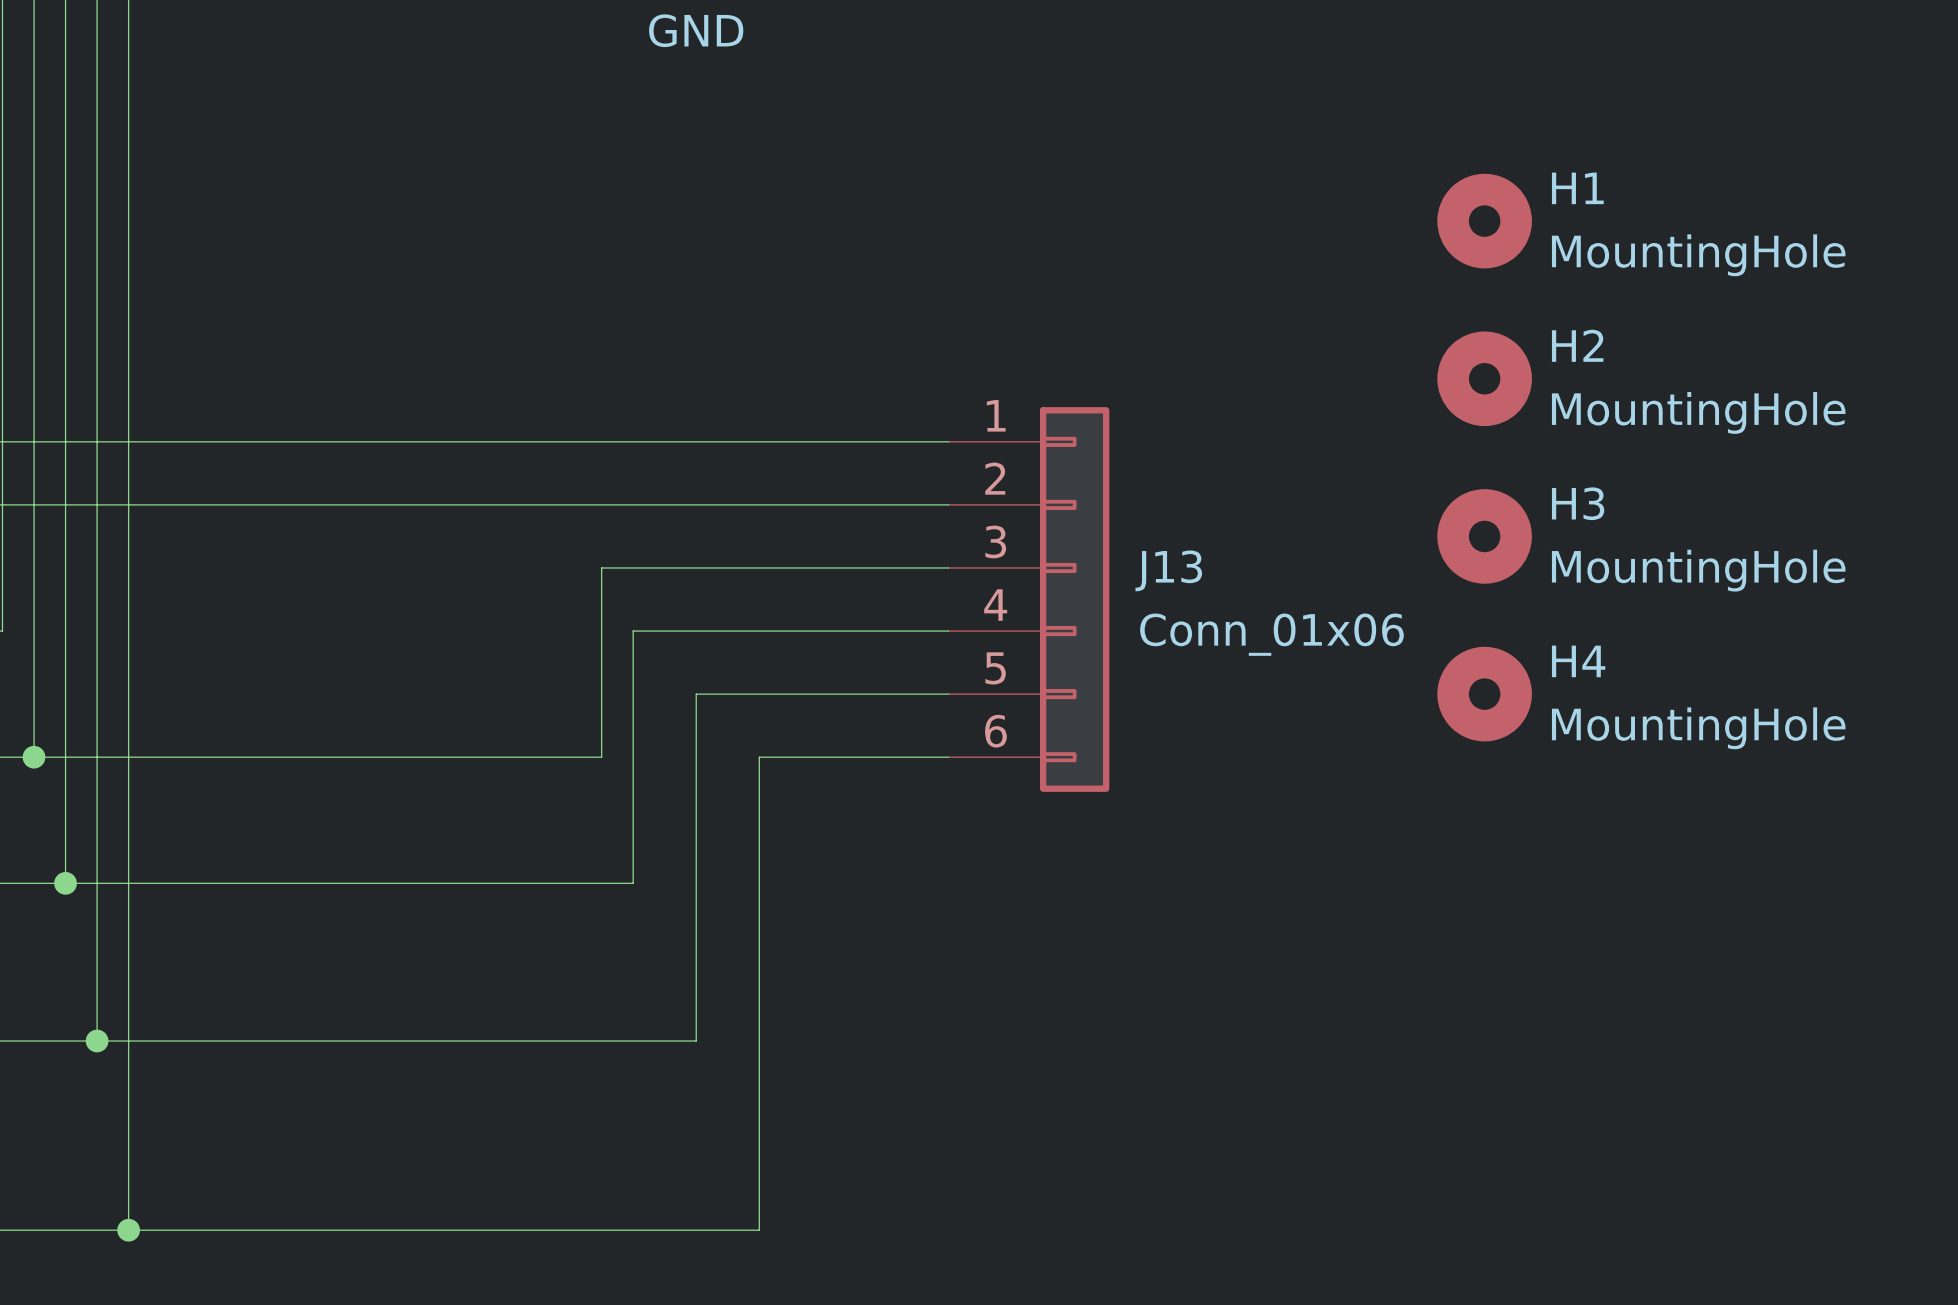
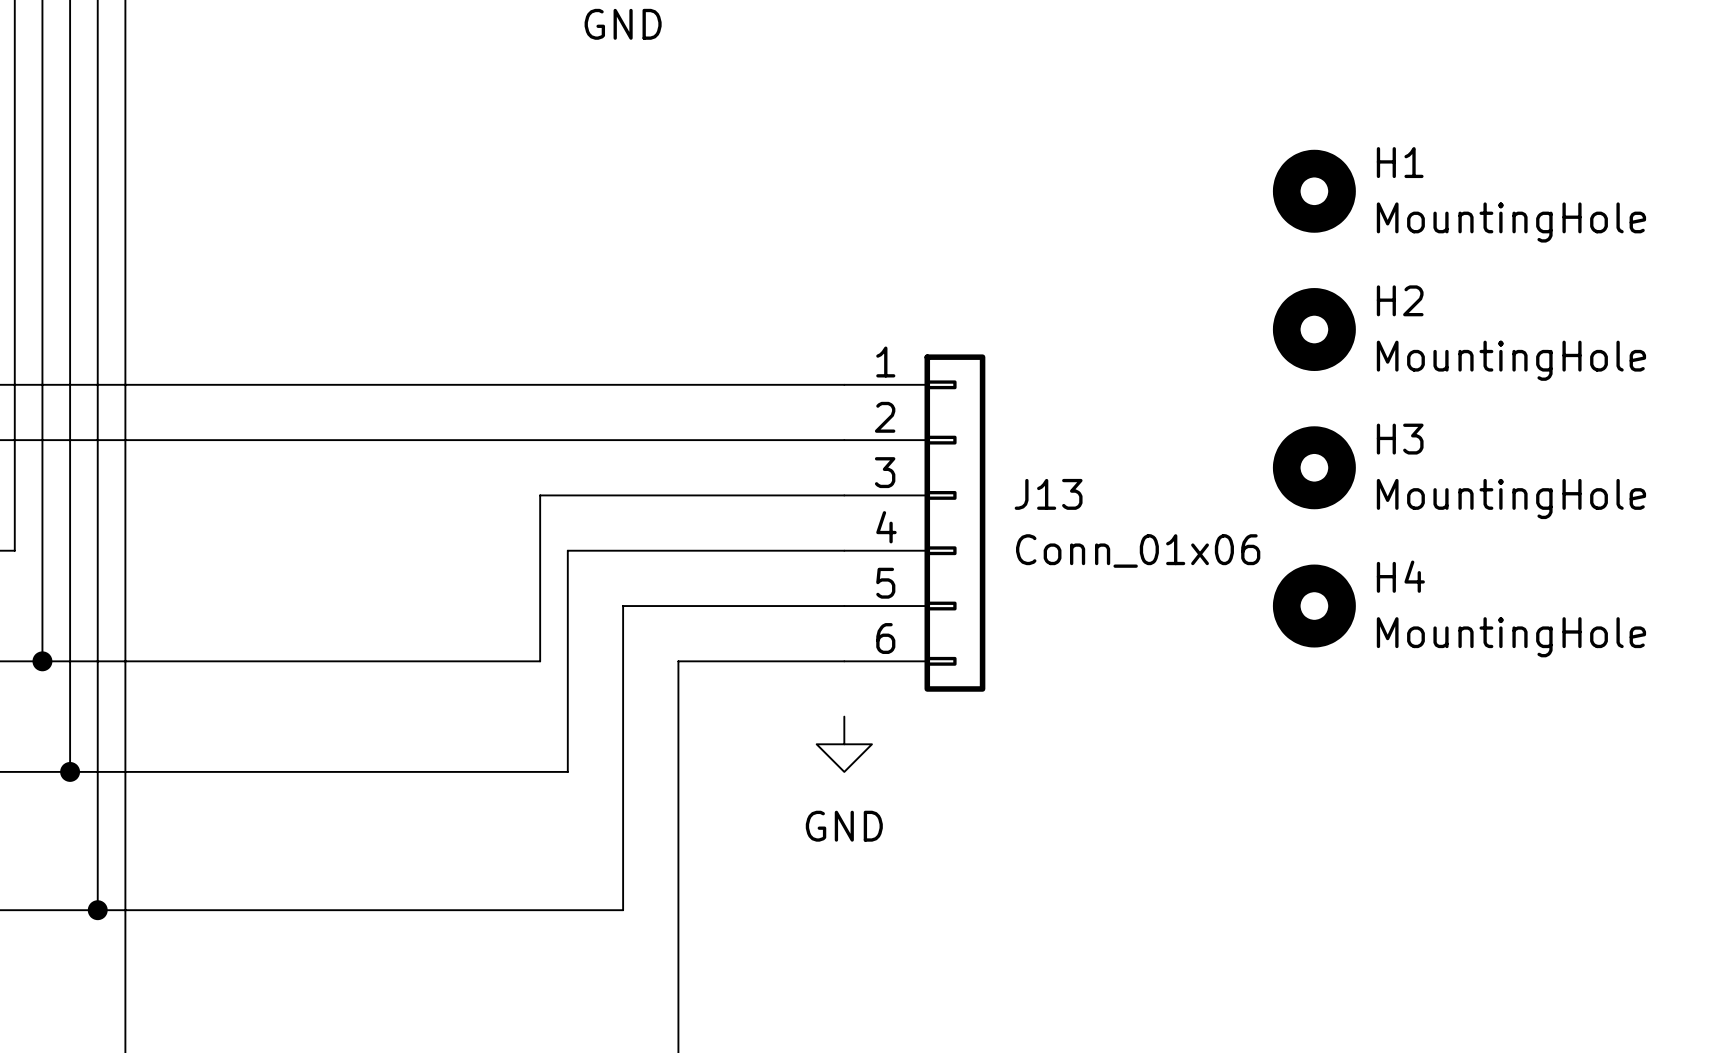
power symbol: none -> GND (844, 744)

